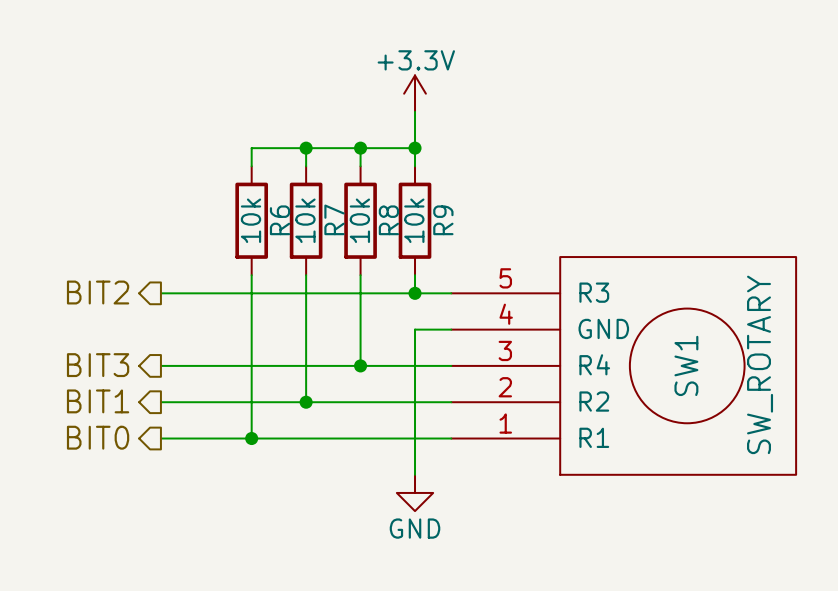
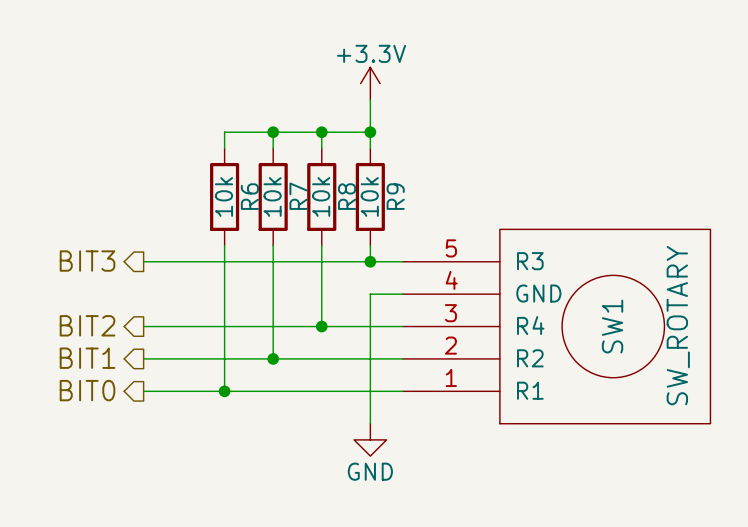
hierarchical label: BIT2 (98, 292) -> BIT3 (87, 261)
hierarchical label: BIT3 (98, 365) -> BIT2 (87, 325)

